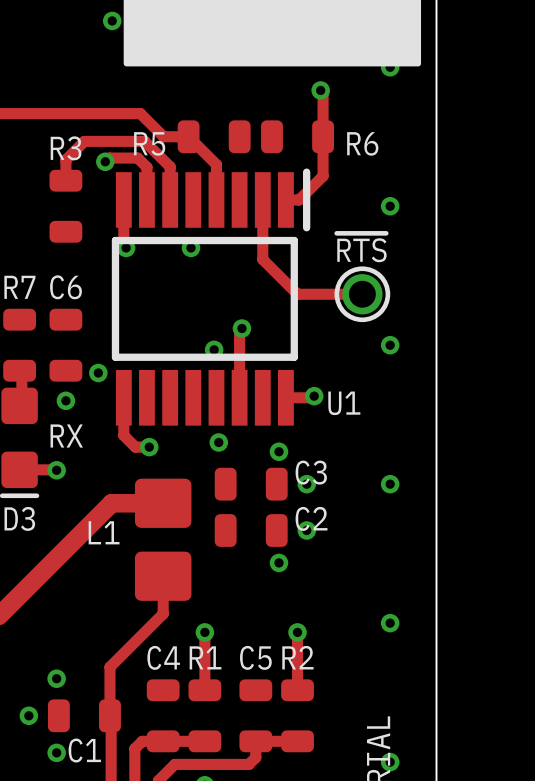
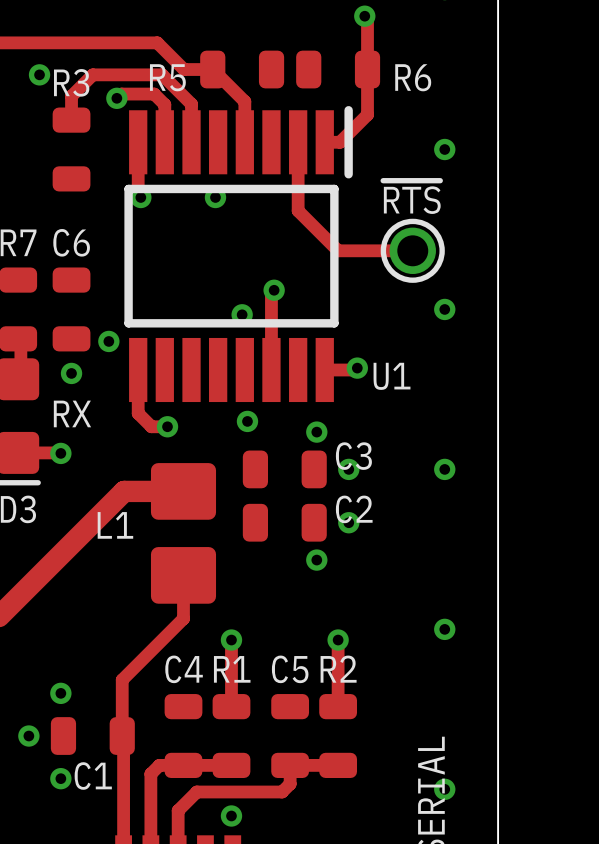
via: none -> (39, 74)

